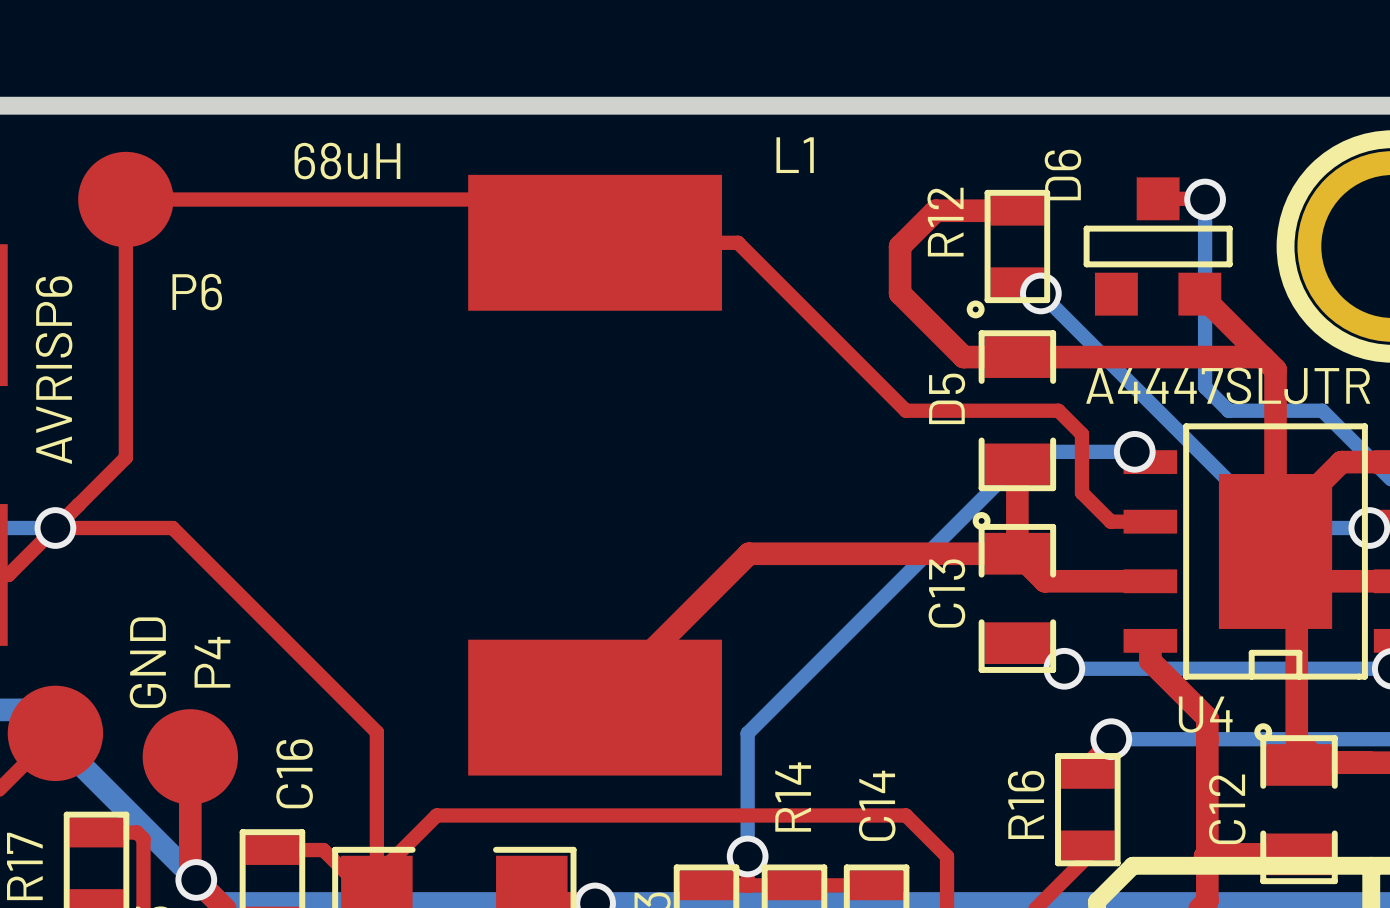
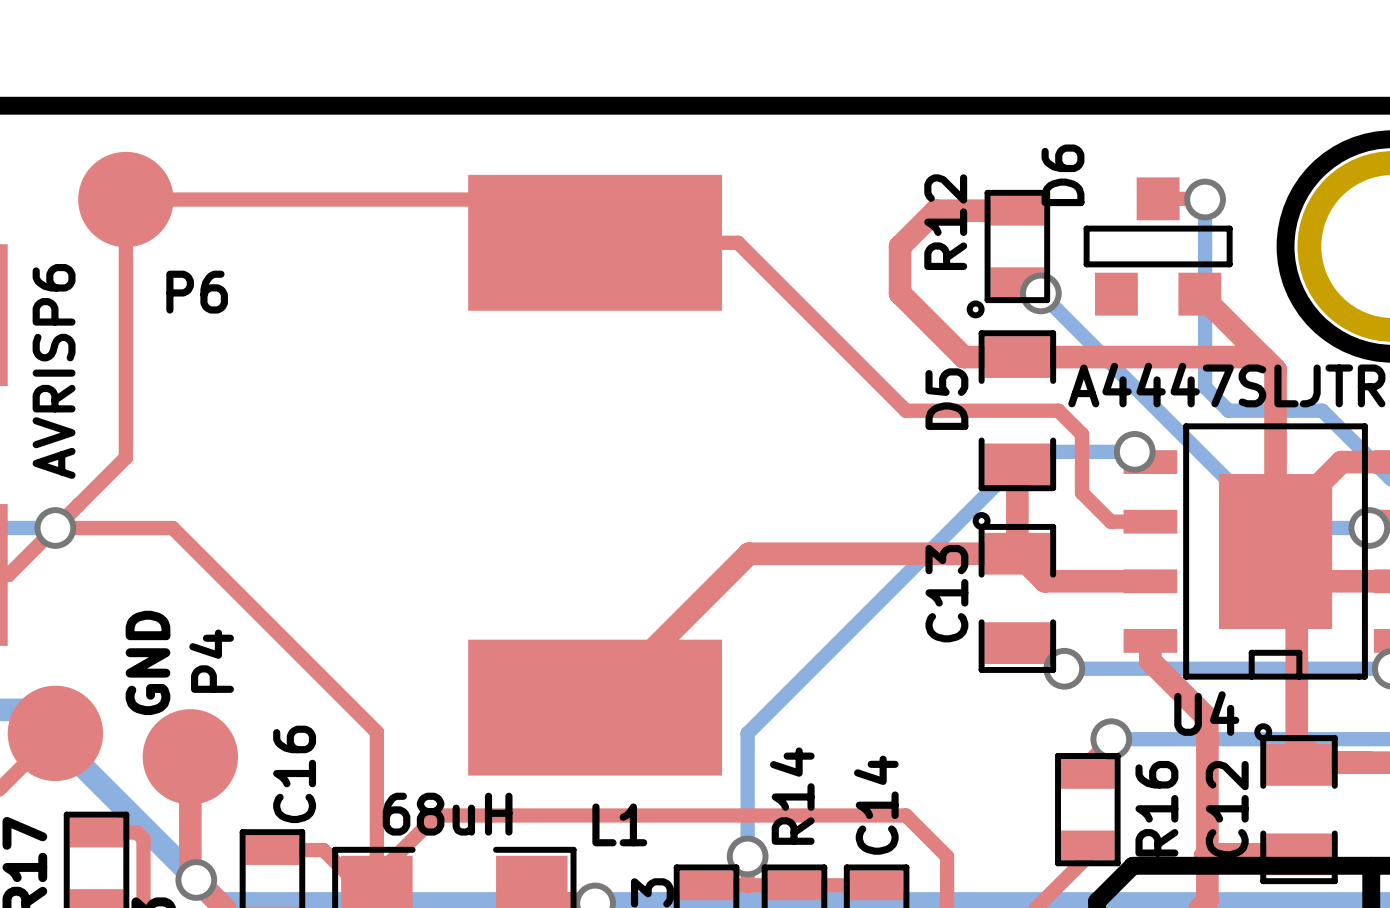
L1 name position: L1 (795, 155) -> L1 (619, 824)
L1 value position: 68uH (347, 161) -> 68uH (447, 814)
R16 name position: R16 (1026, 804) -> R16 (1156, 808)

